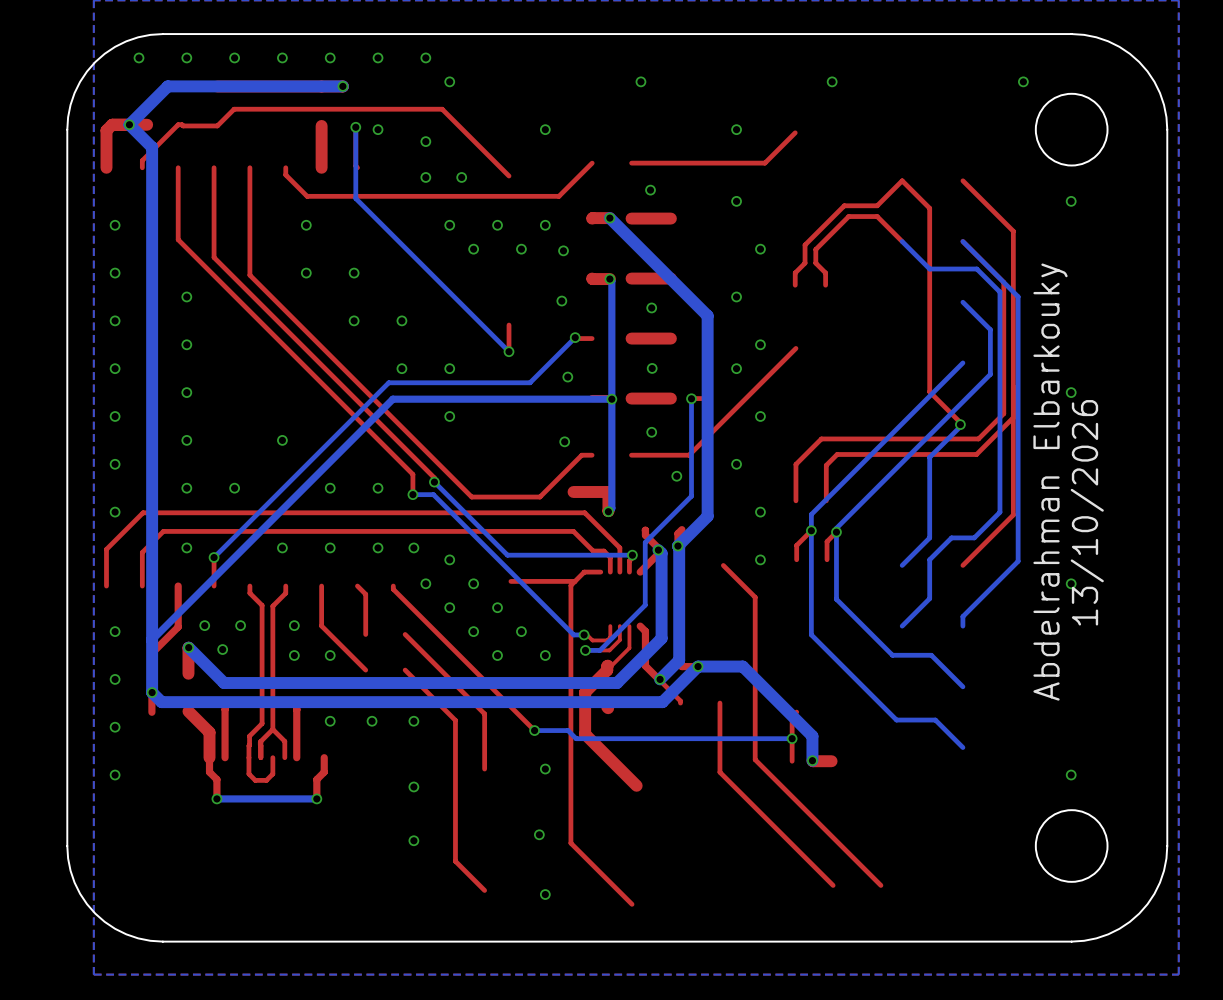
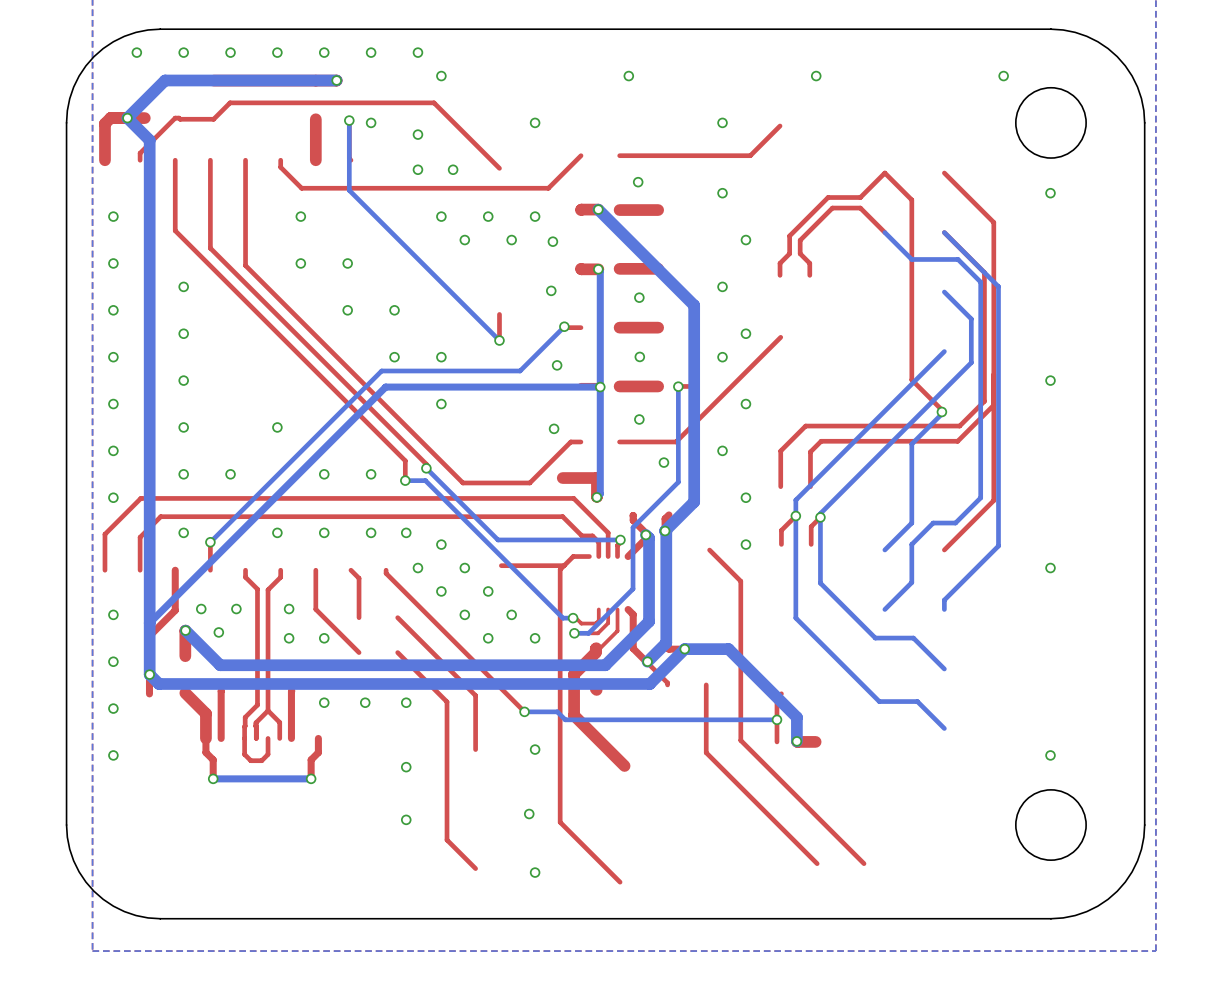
text: Abdelrahman Elbarkouky (1050, 482) -> none
text: 13/10/2026 (1087, 512) -> none

